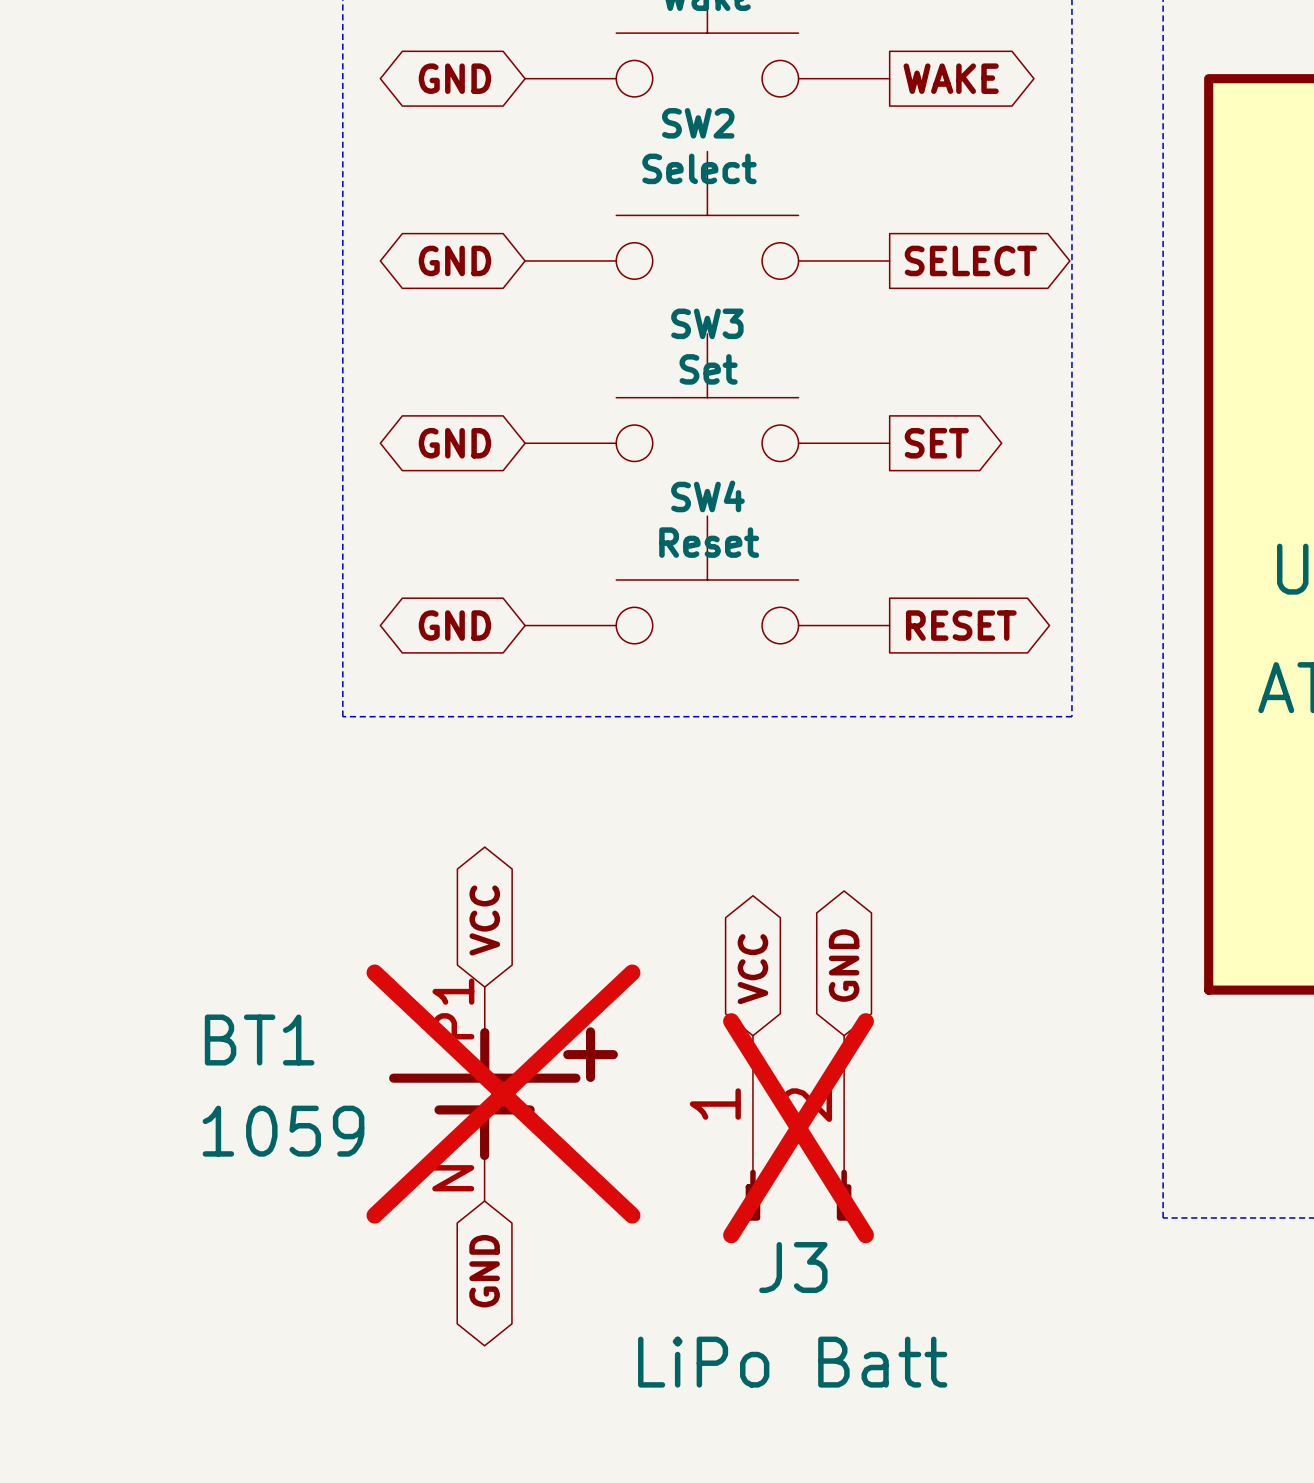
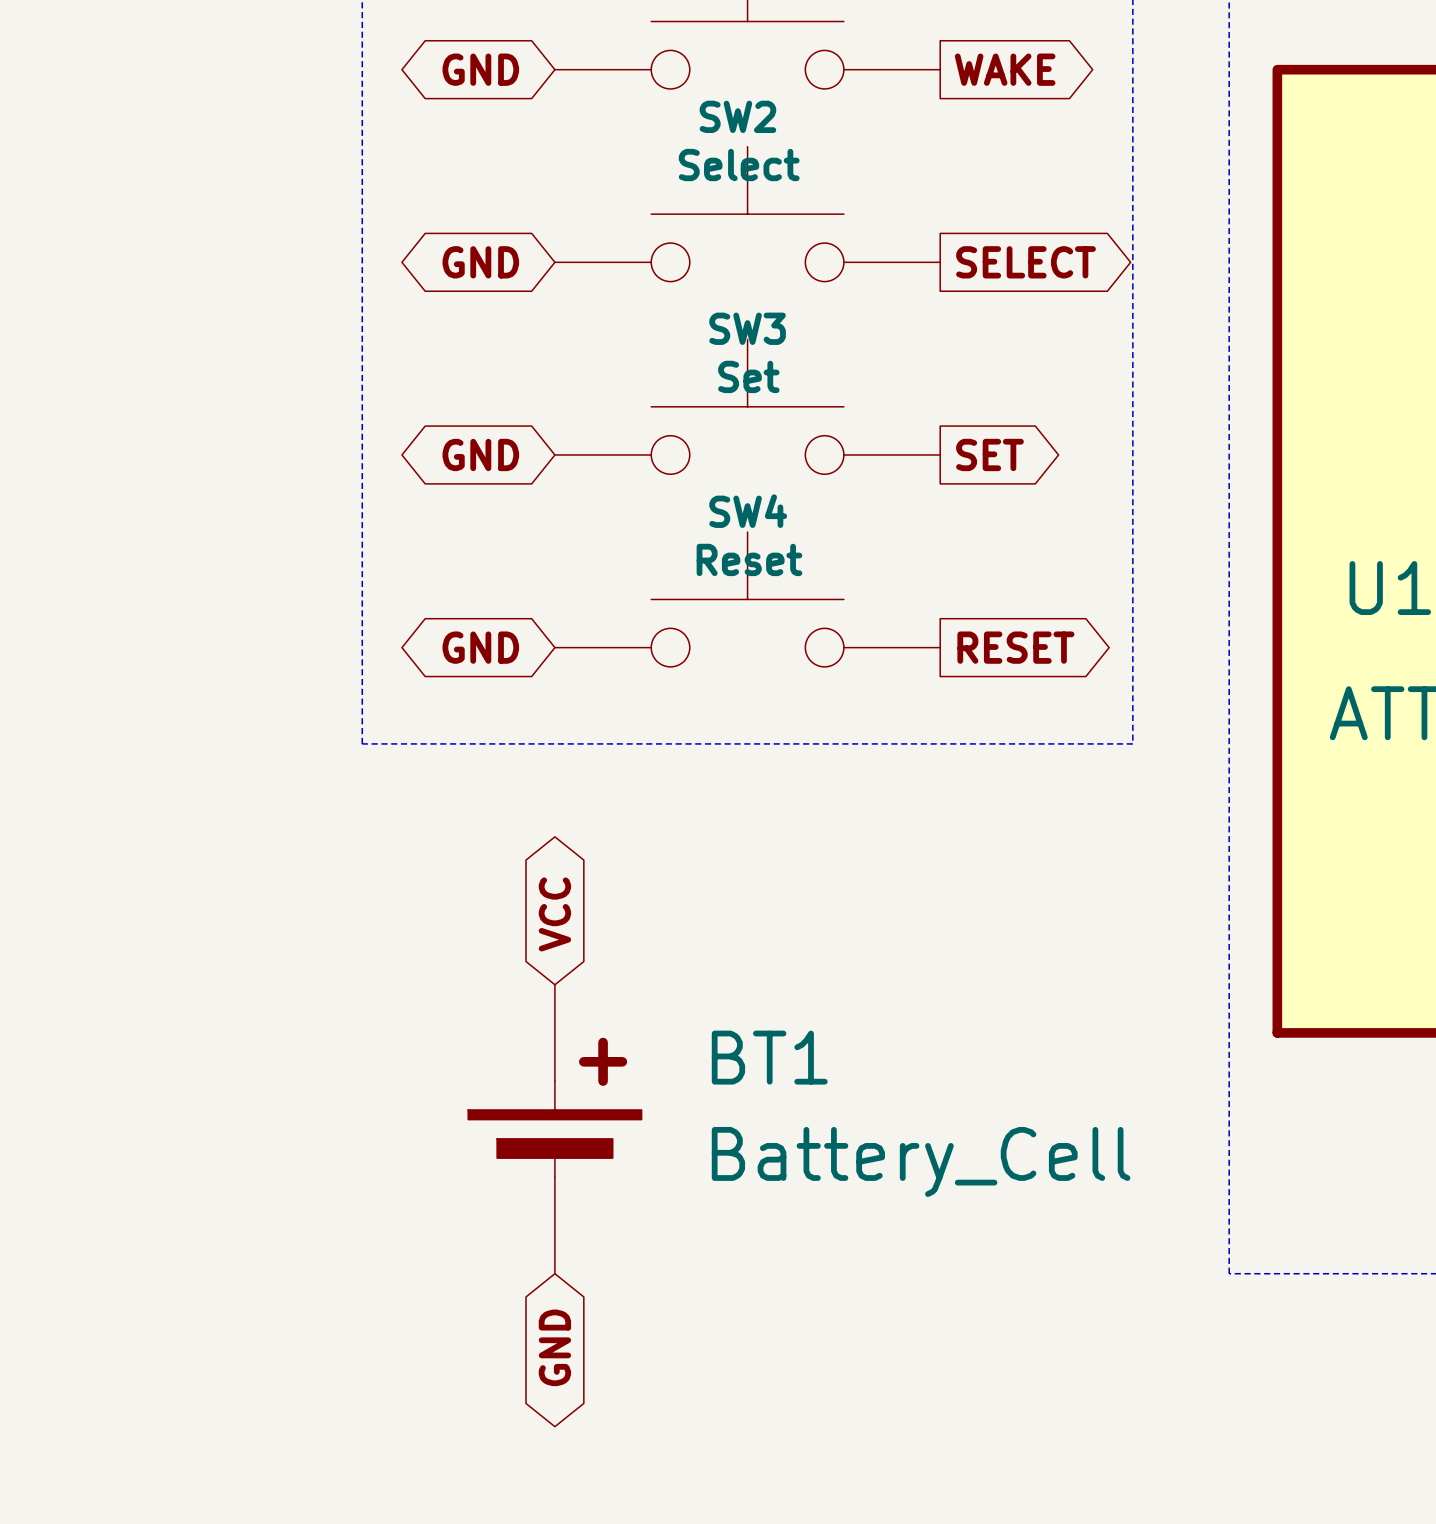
global label position: VCC (484, 920) -> VCC (554, 914)
global label: GND (844, 965) -> none
global label: VCC (752, 969) -> none
BT1 symbol: [389, 987, 618, 1202] -> [468, 984, 642, 1274]
BT1 name position: BT1 (259, 1040) -> BT1 (769, 1057)
BT1 do-not-place cross: (503, 1094) -> none
J3: LiPo Batt (798, 1128) -> none
BT1 value: 1059 (283, 1131) -> Battery_Cell (921, 1161)
global label position: GND (484, 1271) -> GND (554, 1347)

